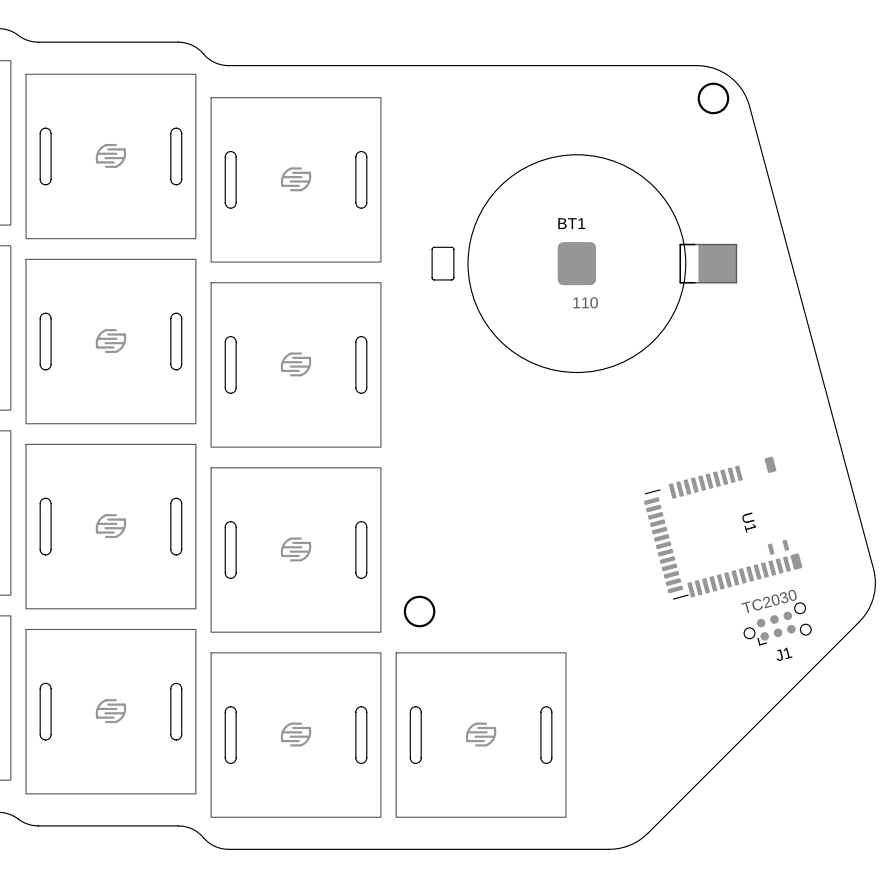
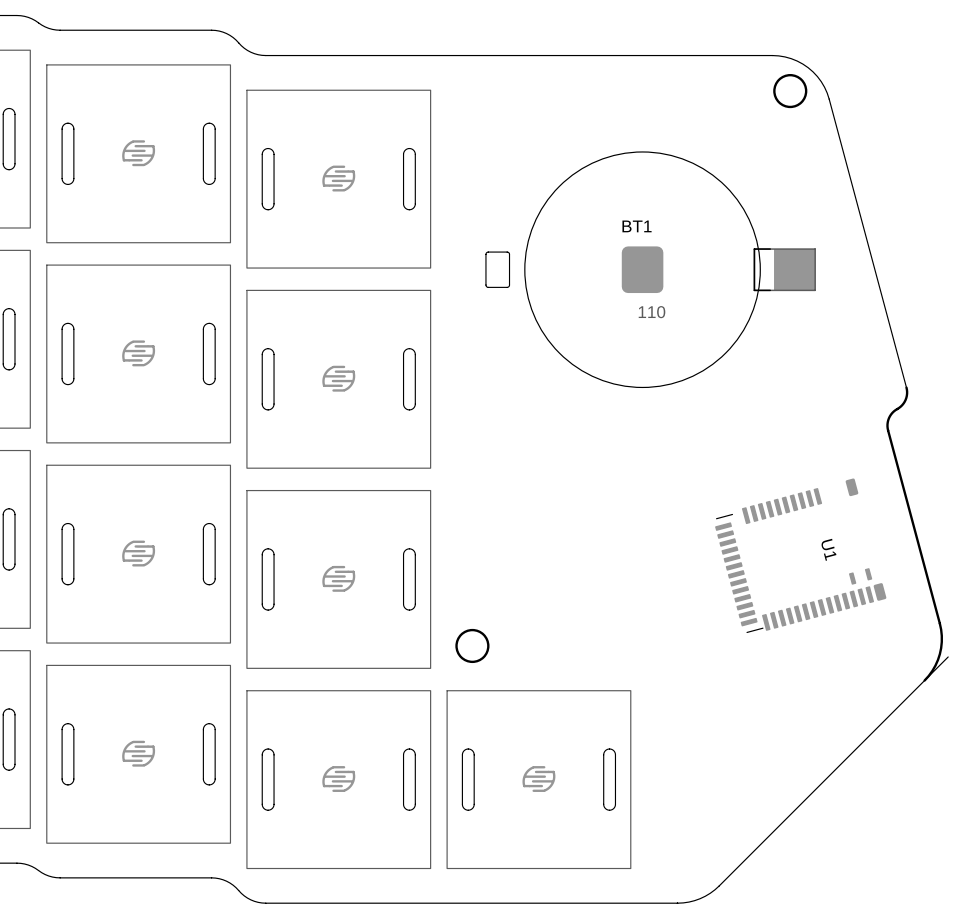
board edge: (820, 372) (874, 574) (875, 586) (871, 602) (859, 621) -> (906, 387) (905, 399) (891, 414) (887, 426) (941, 629) (939, 654) (935, 665) (924, 680)
J1: TC2030 (777, 624) -> none

